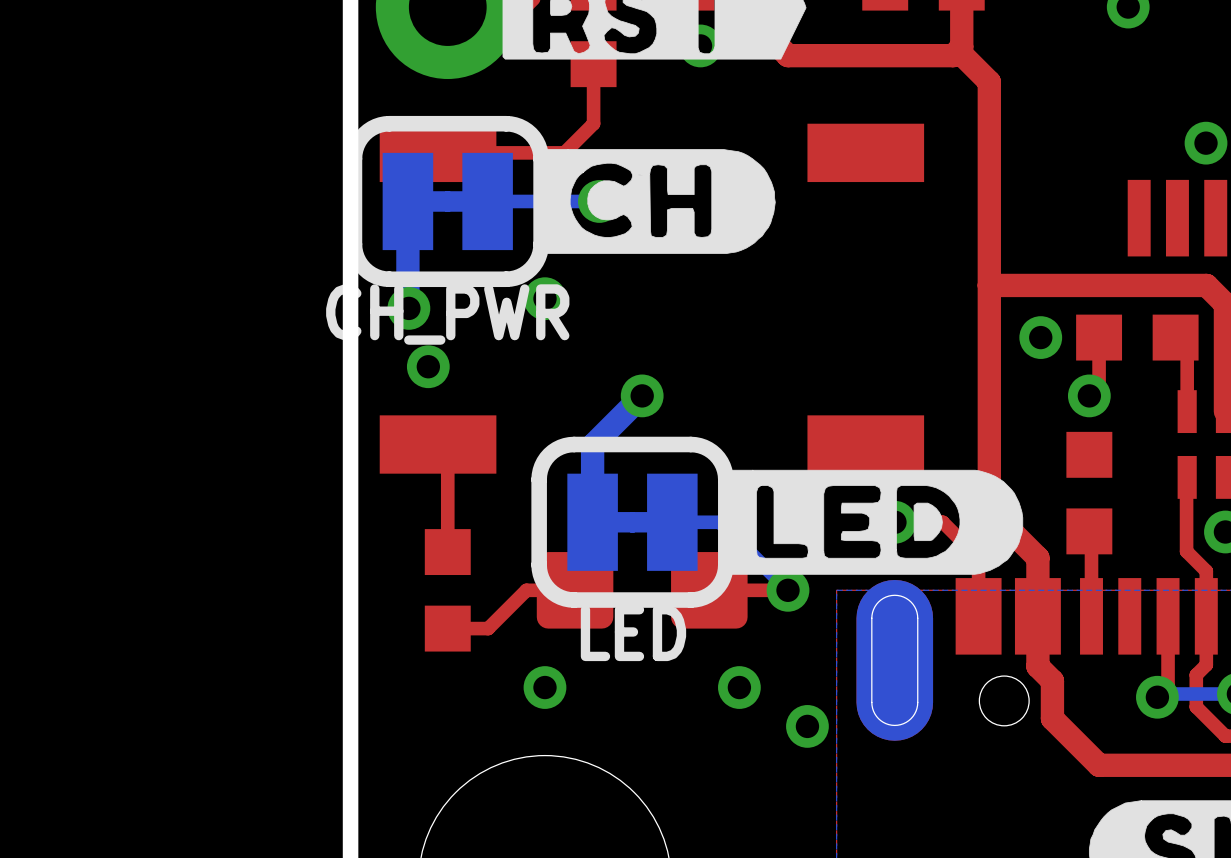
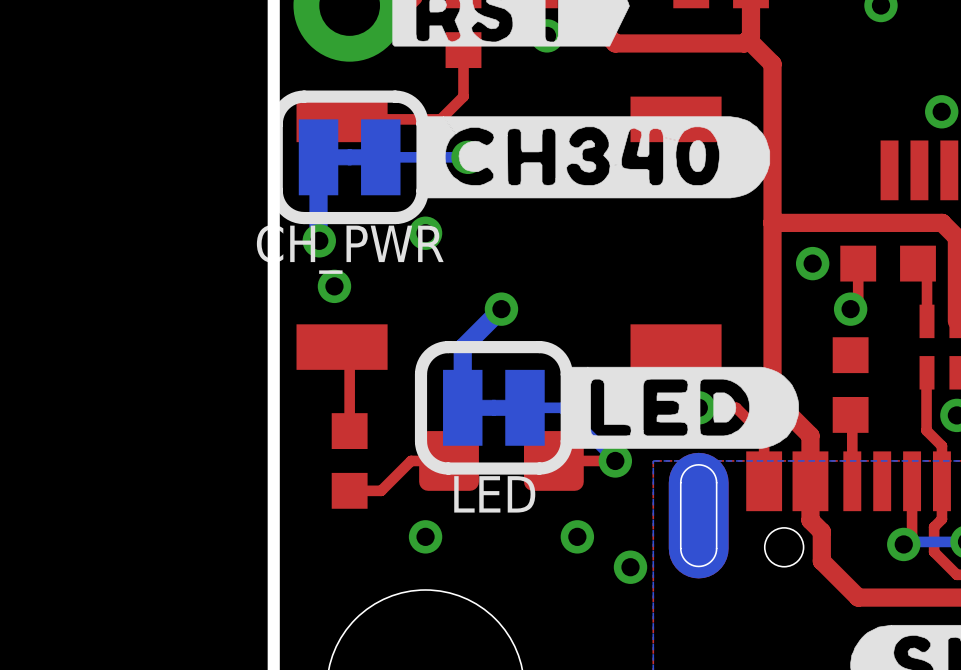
drawing: [541, 149, 776, 254] -> none
drawing: none -> [422, 116, 771, 199]

